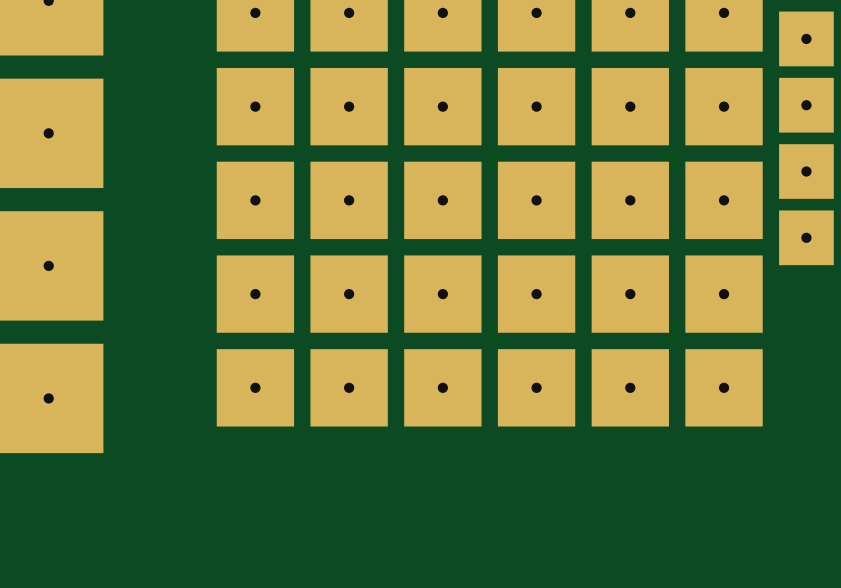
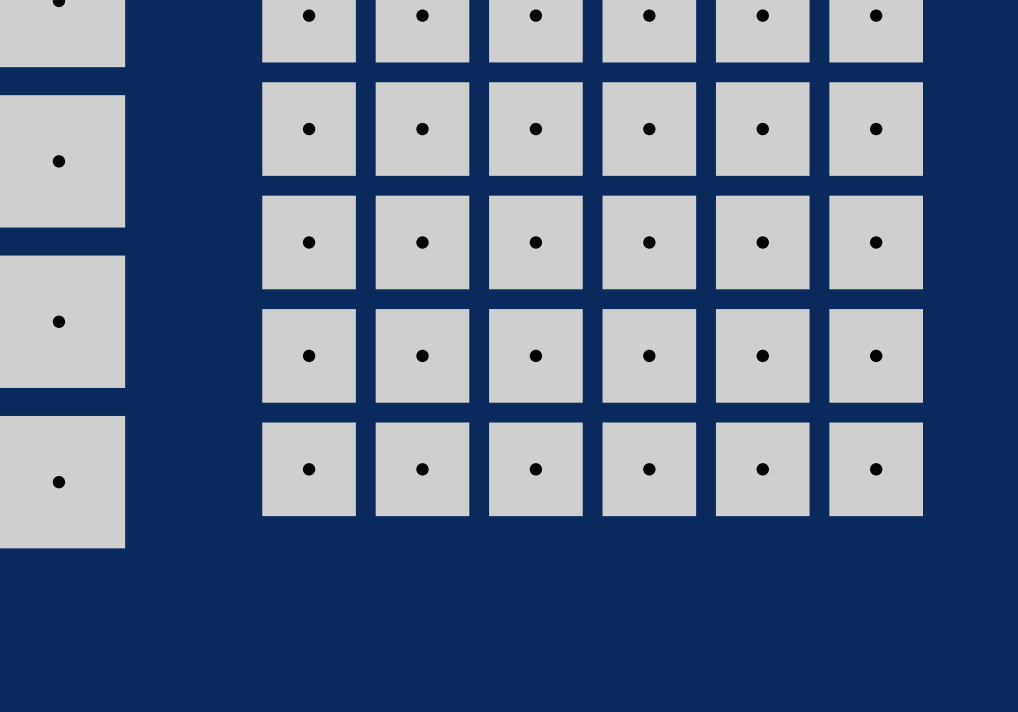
part: (806, 38) -> none
part: (806, 105) -> none
part: (806, 171) -> none
part: (806, 237) -> none

